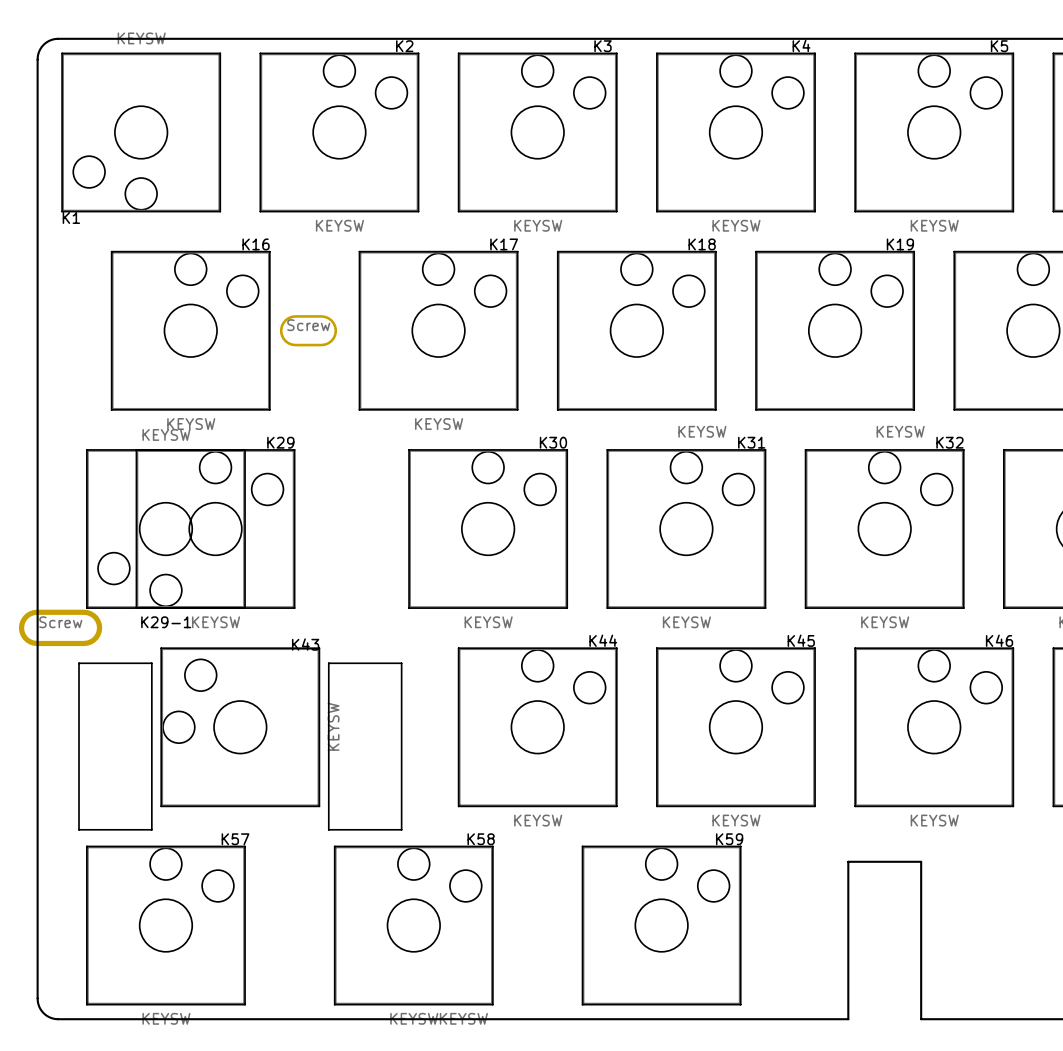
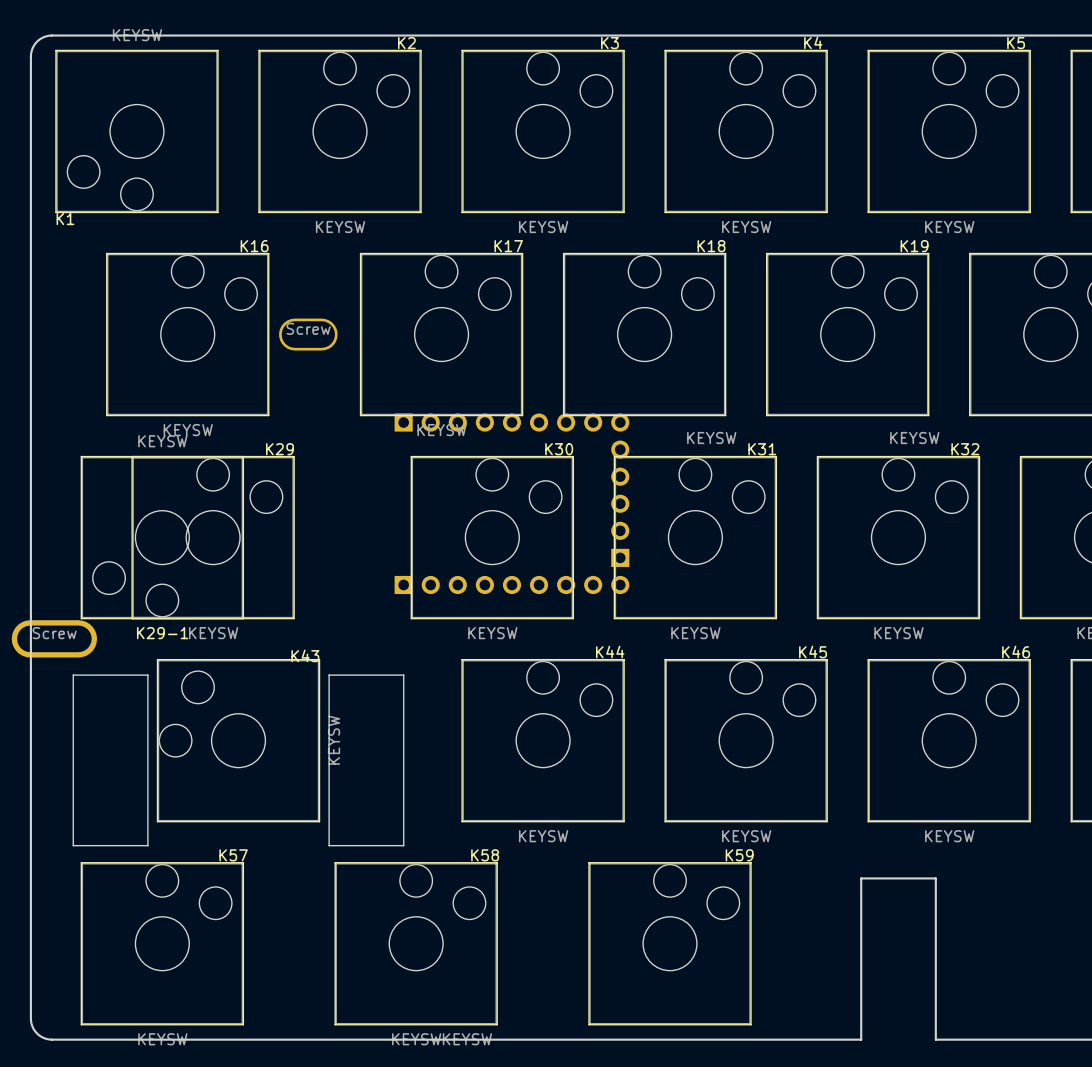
part: none -> (511, 422)
part: none -> (620, 503)
part: none -> (511, 584)

